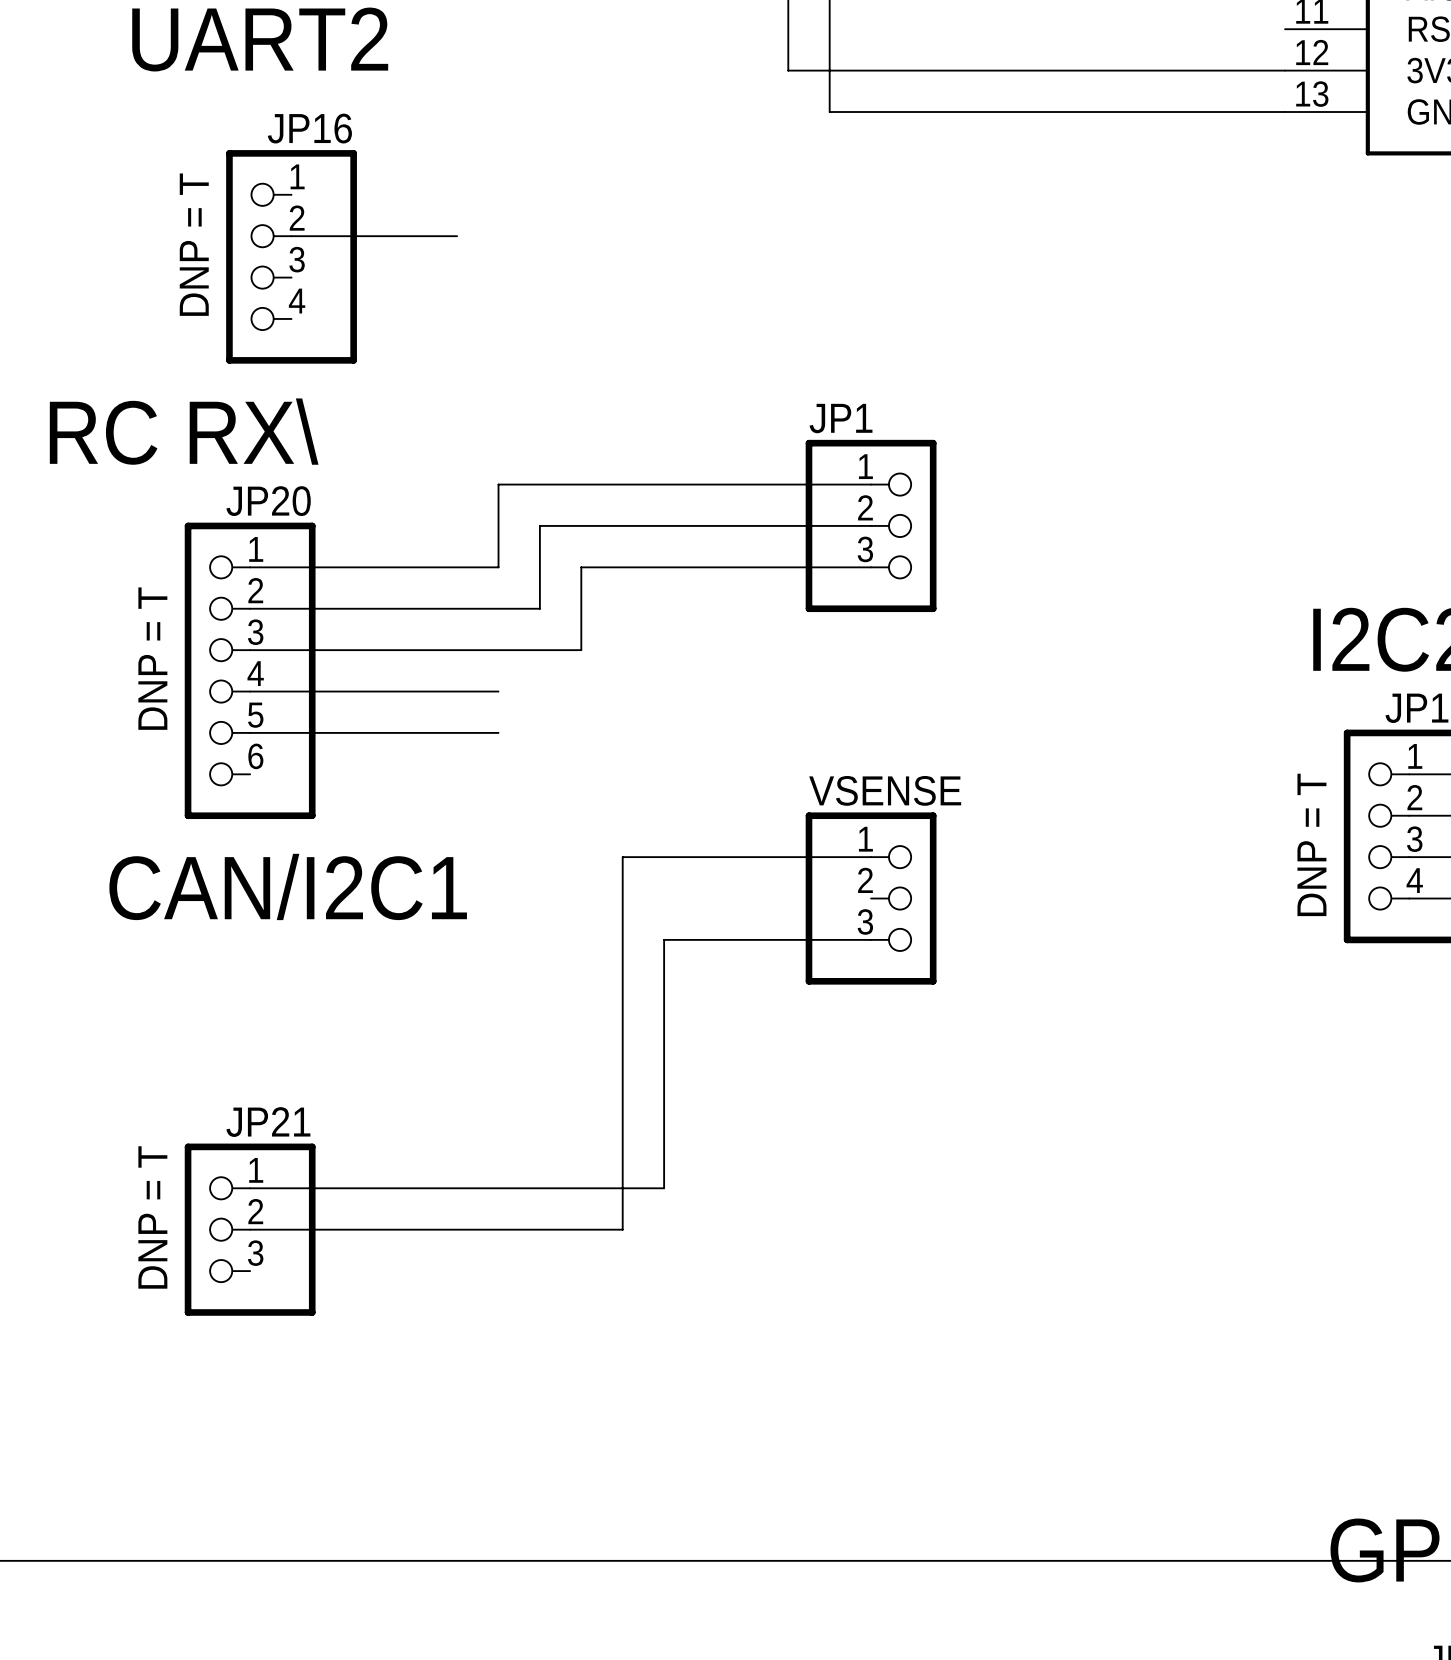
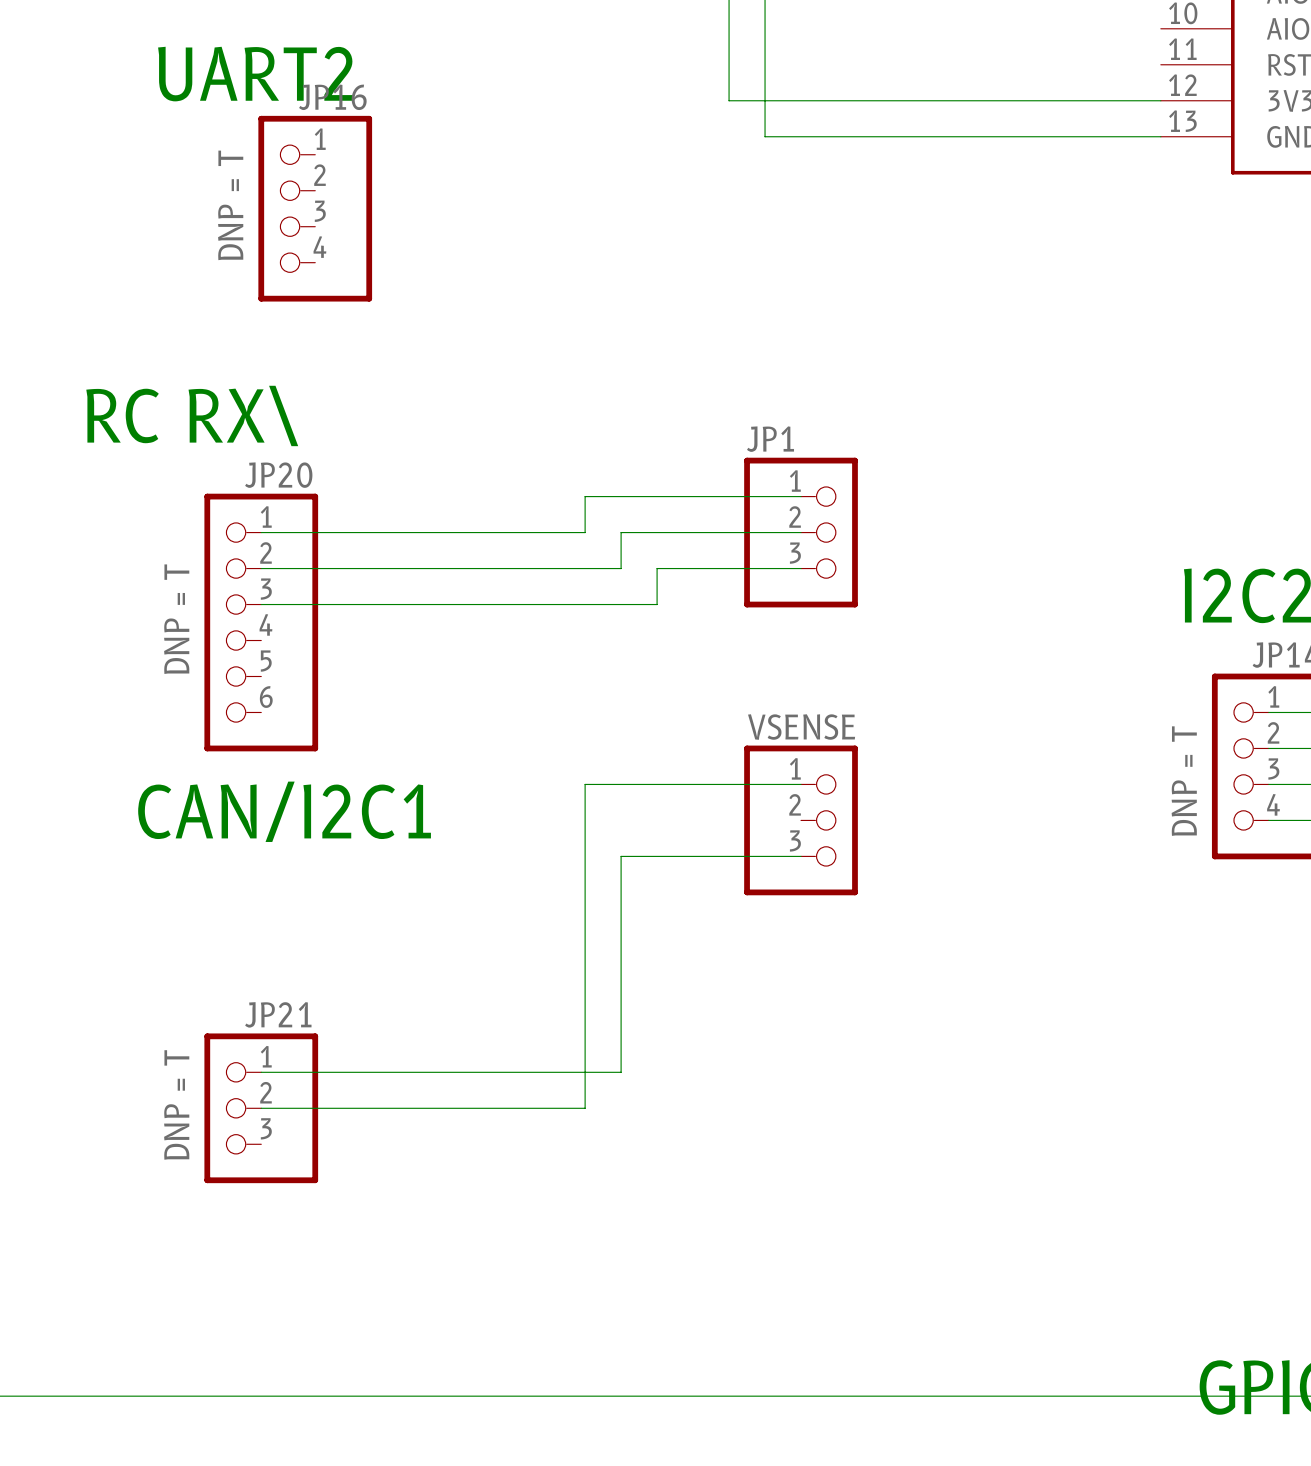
wire: (291, 236) (457, 236) -> none
JP16 position: (291, 256) -> (315, 208)
wire: (871, 484) (498, 484) (498, 567) -> none
wire: (622, 525) (539, 525) (539, 608) -> (621, 532) (621, 568) (513, 568)
JP1 position: (871, 525) -> (801, 532)
wire: (581, 567) (581, 650) -> (549, 532) (477, 532)
wire: (622, 567) (664, 567) -> (585, 532) (585, 496)
wire: none -> (801, 568) (657, 568) (657, 604) (549, 604)
wire: (250, 691) (498, 691) -> none
wire: (250, 732) (498, 732) -> none

